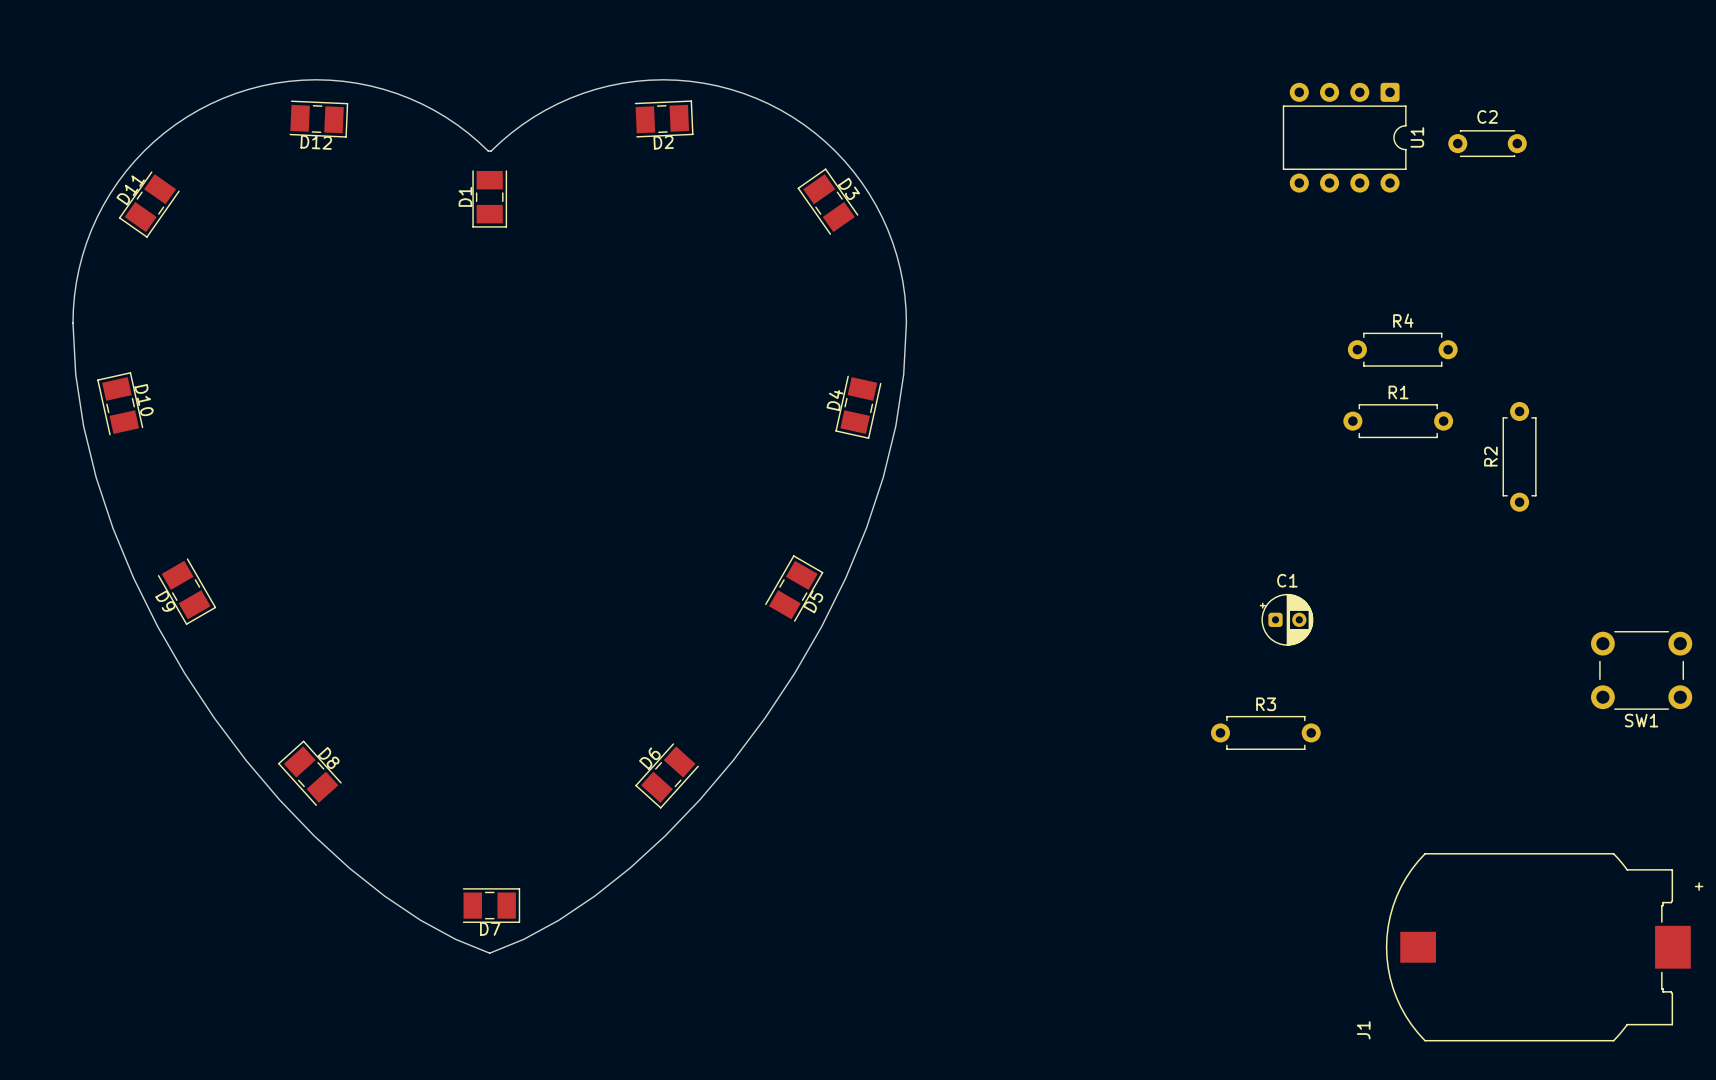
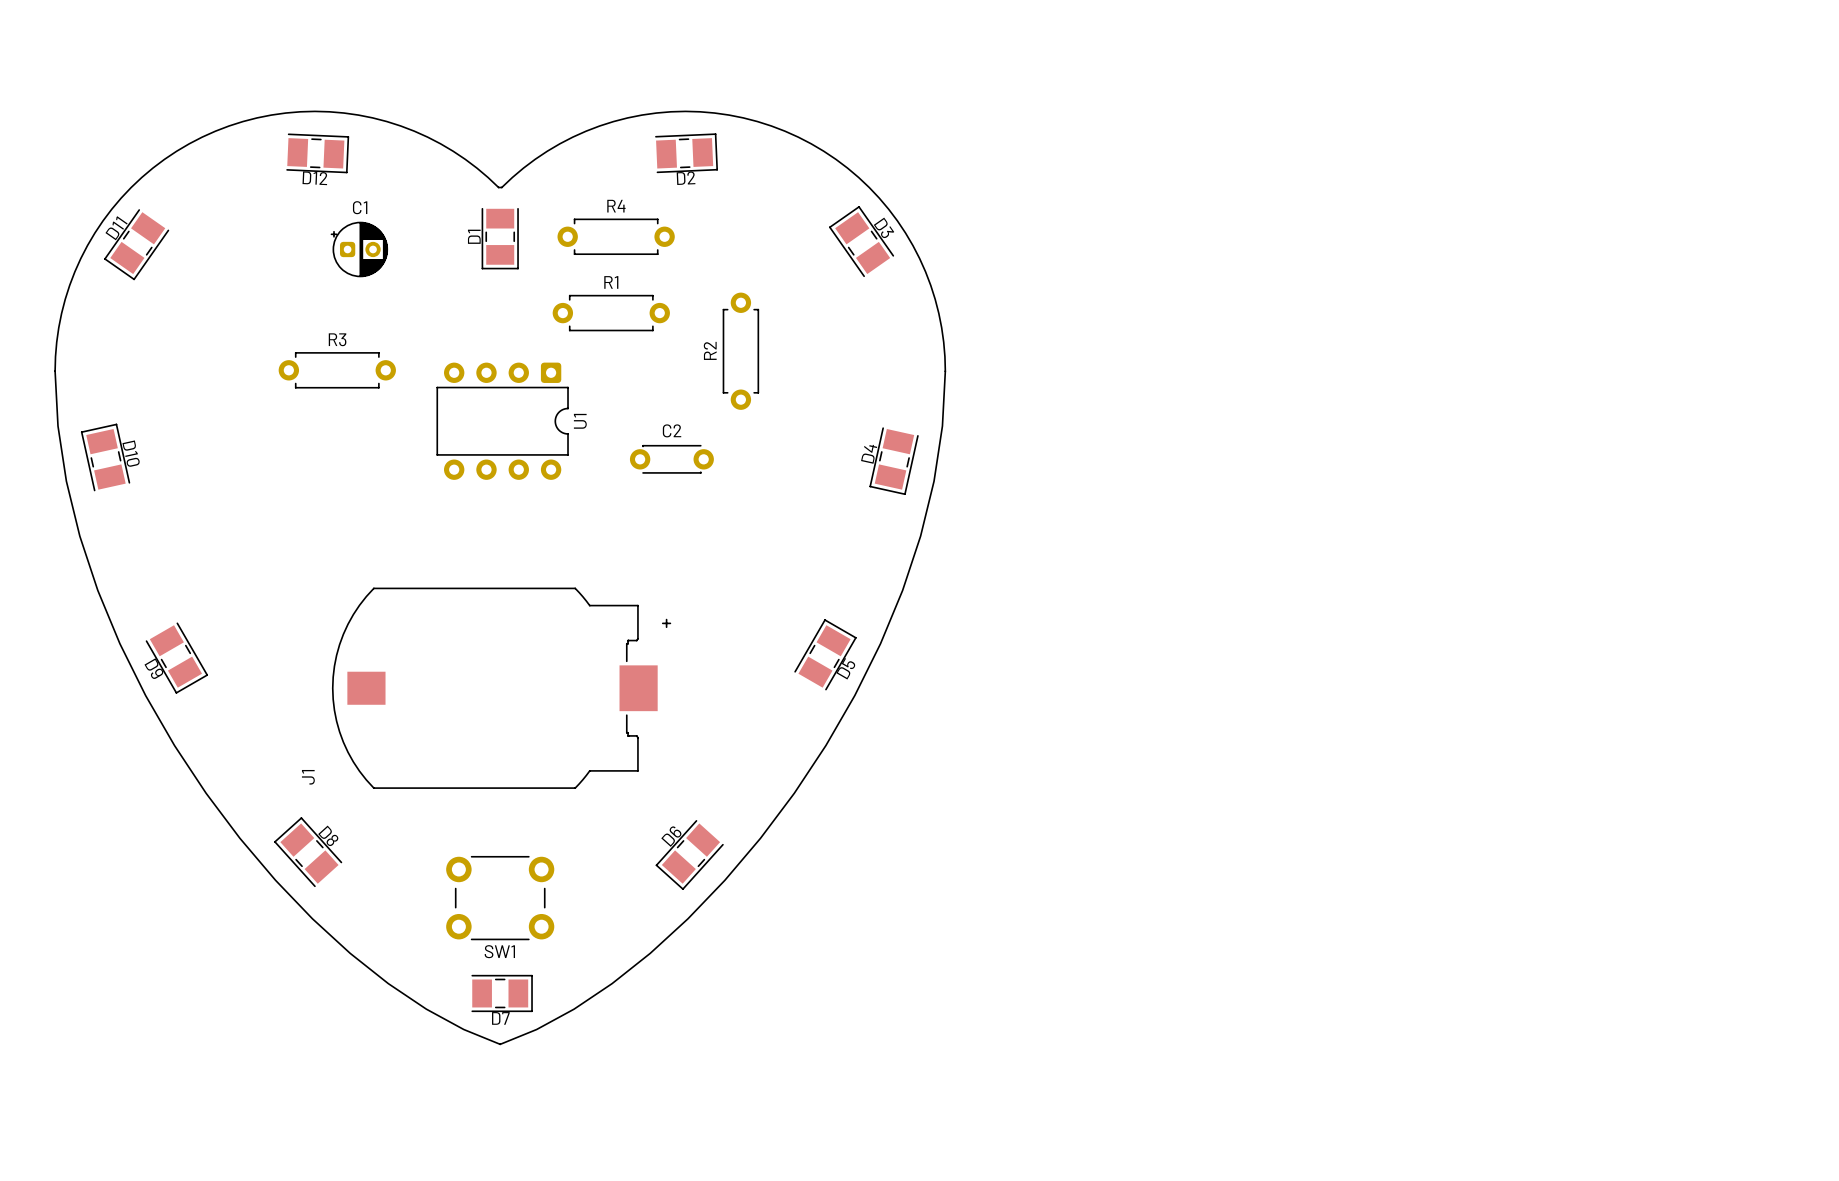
U1 position: (1344, 137) -> (502, 421)
C2 position: (1487, 143) -> (671, 459)
R4 position: (1402, 349) -> (616, 236)
R1 position: (1398, 421) -> (611, 313)
R2 position: (1519, 456) -> (740, 351)
C1 position: (1286, 619) -> (359, 249)
SW1 position: (1641, 670) -> (500, 898)
R3 position: (1265, 732) -> (337, 370)
J1 position: (1544, 947) -> (501, 688)

